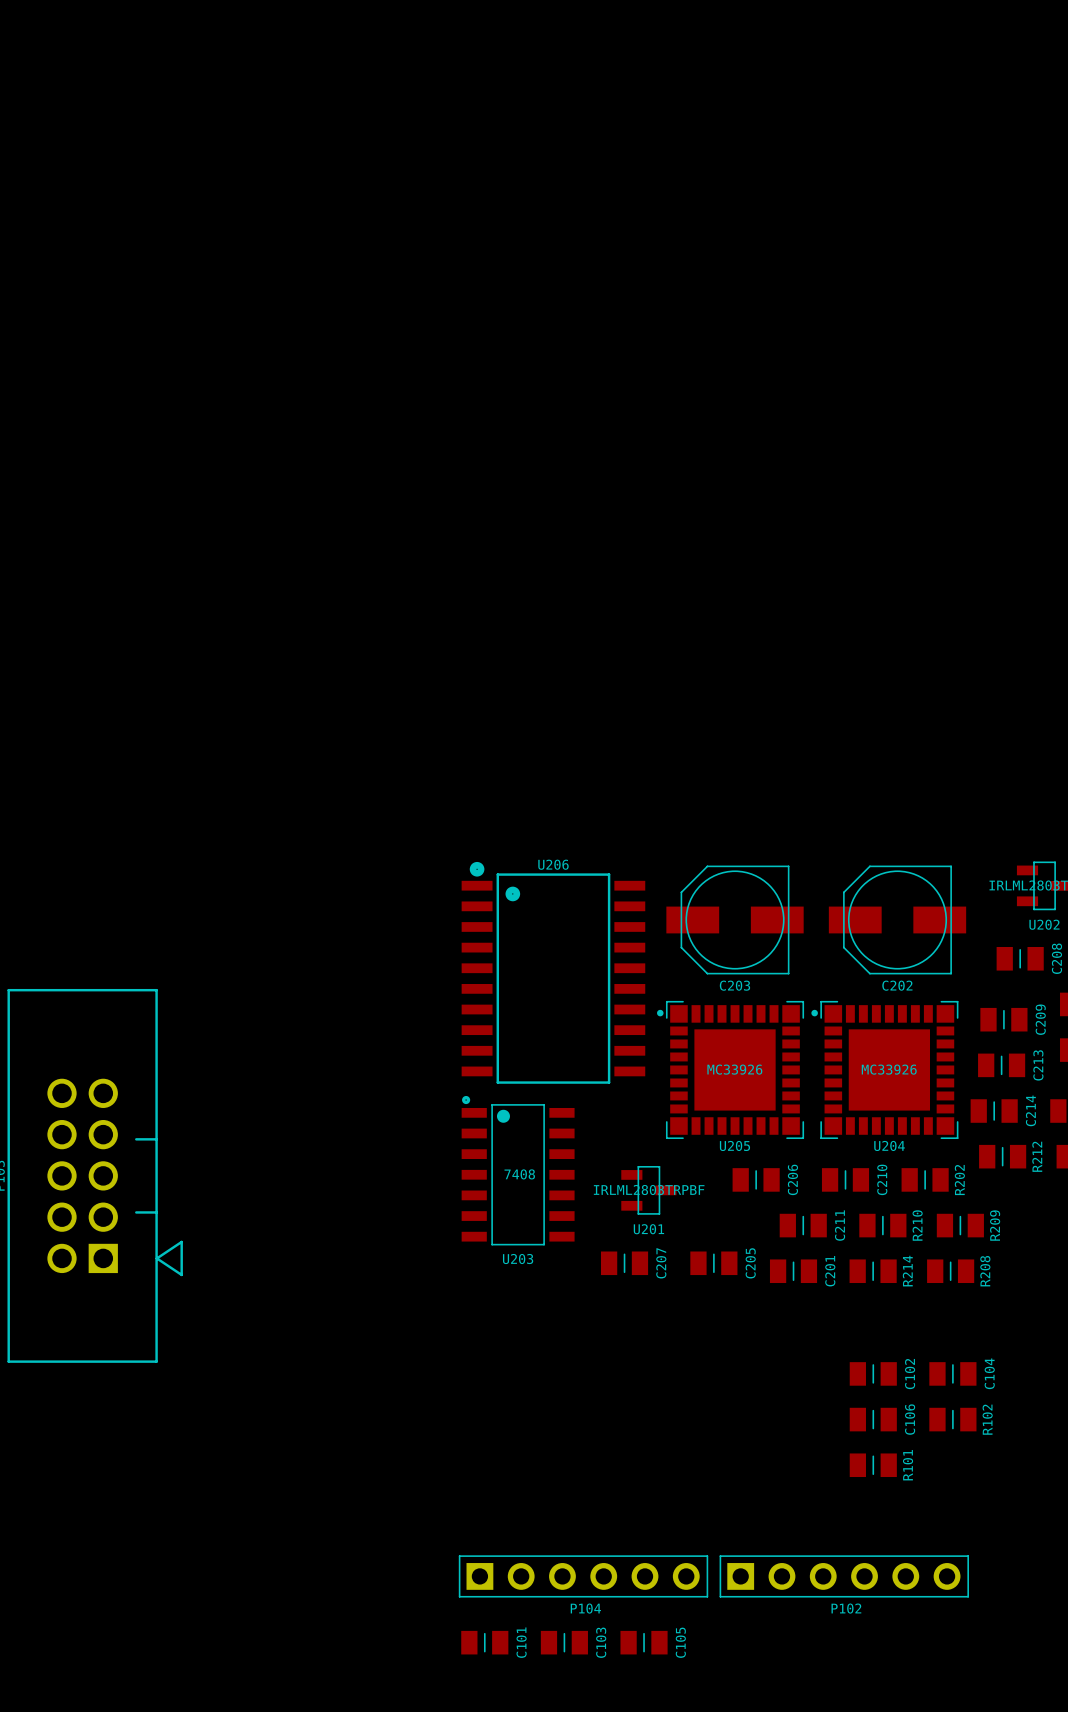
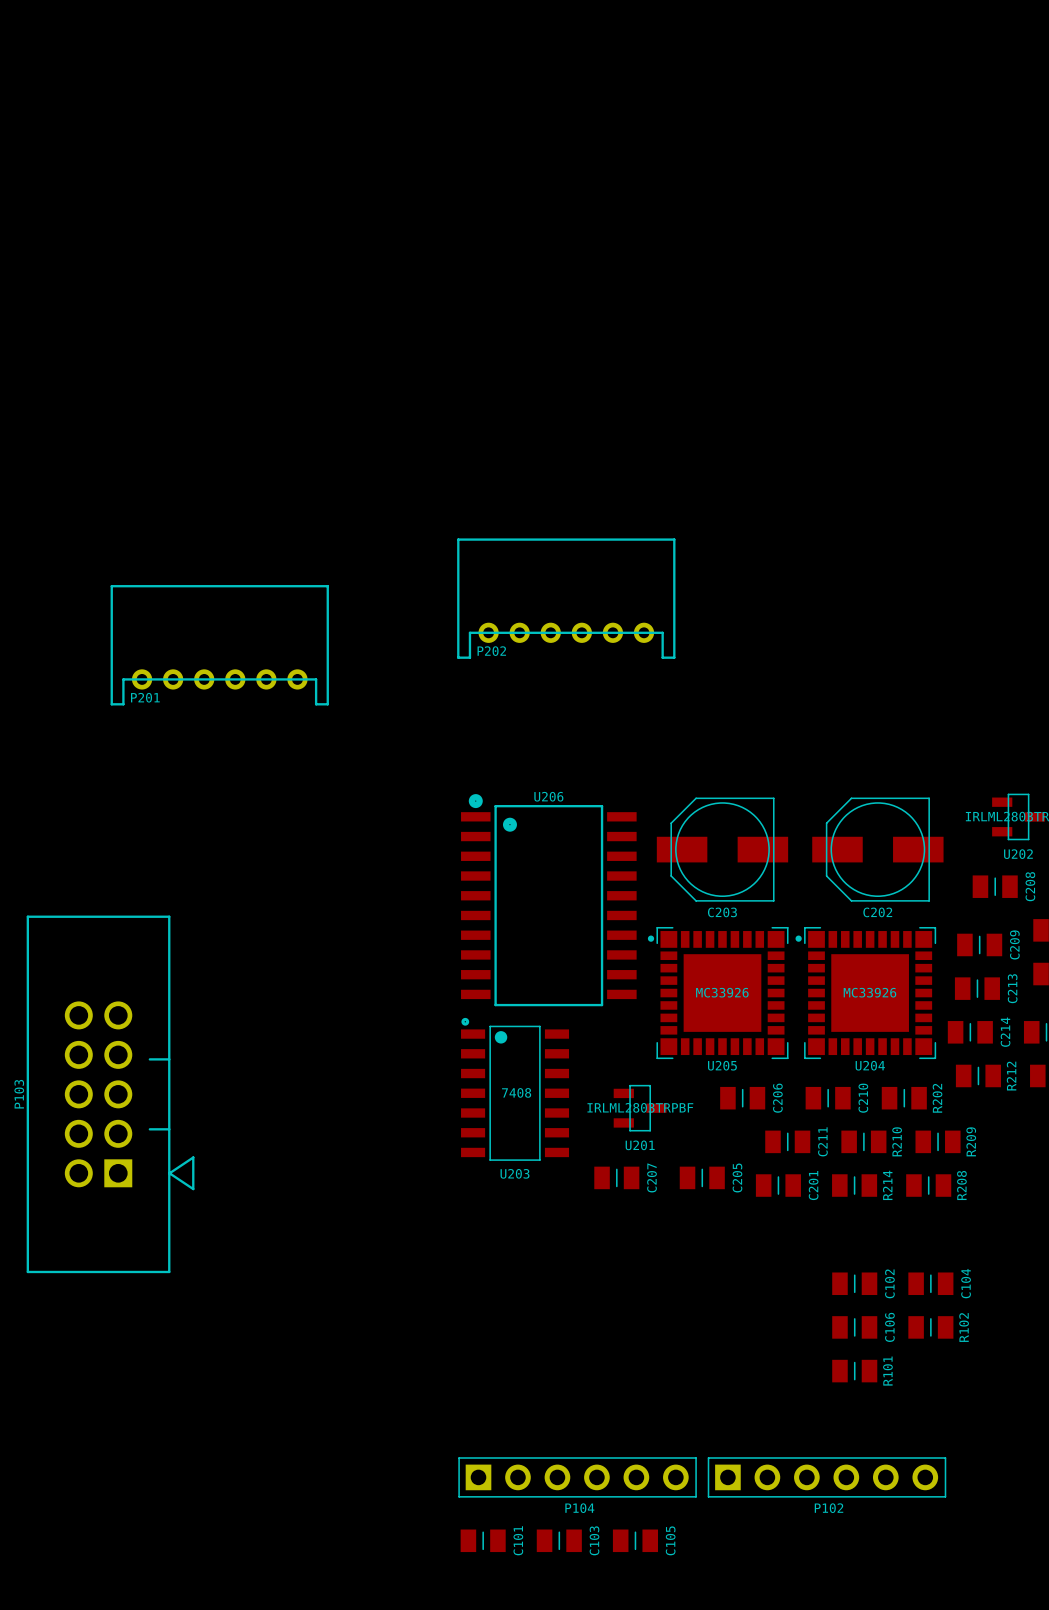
P202: none -> (566, 598)
P201: none -> (219, 645)

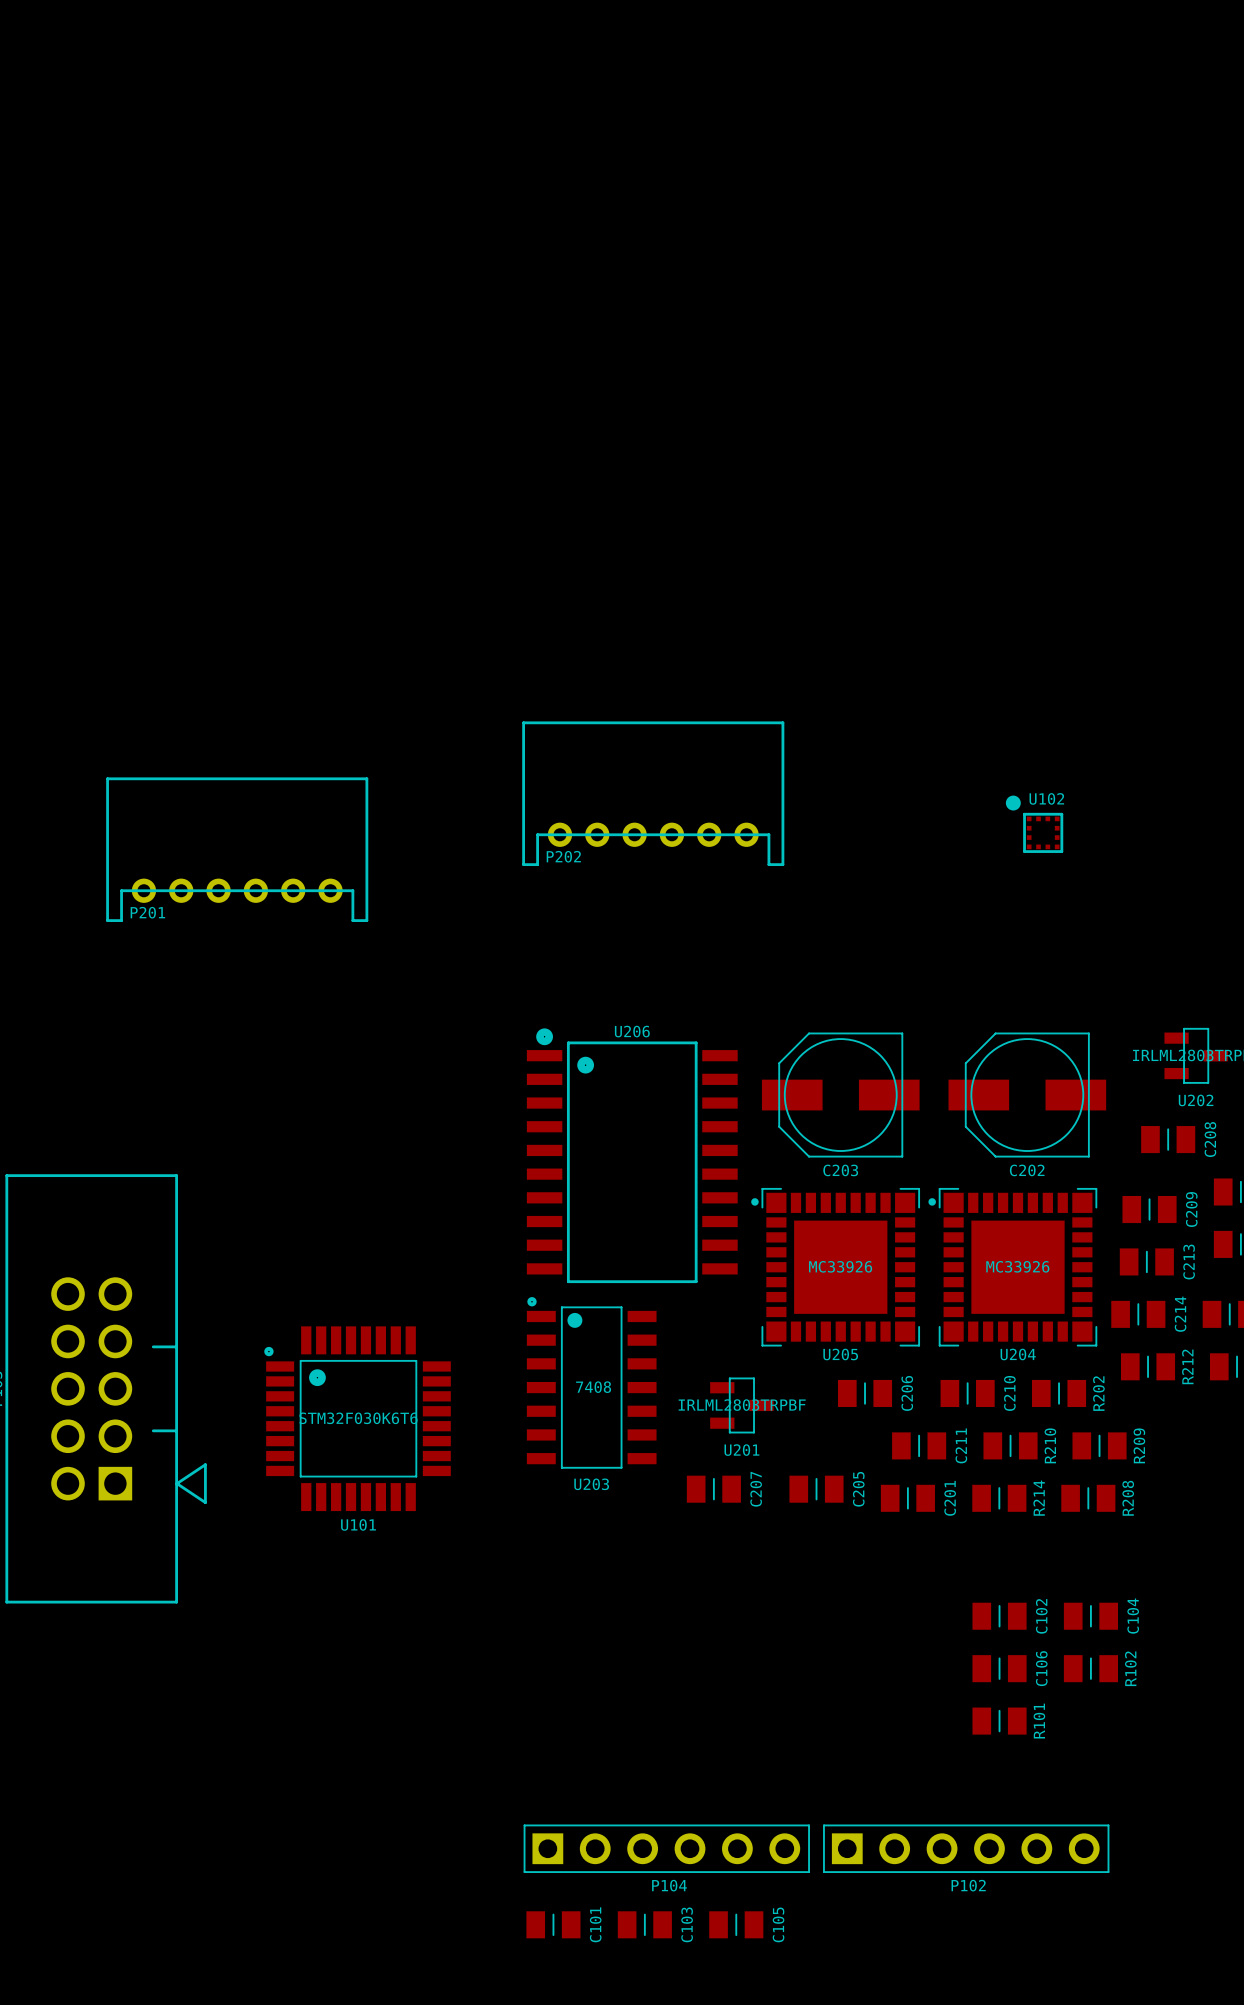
U102: none -> (1034, 824)
U101: none -> STM32F030K6T6 (357, 1418)

